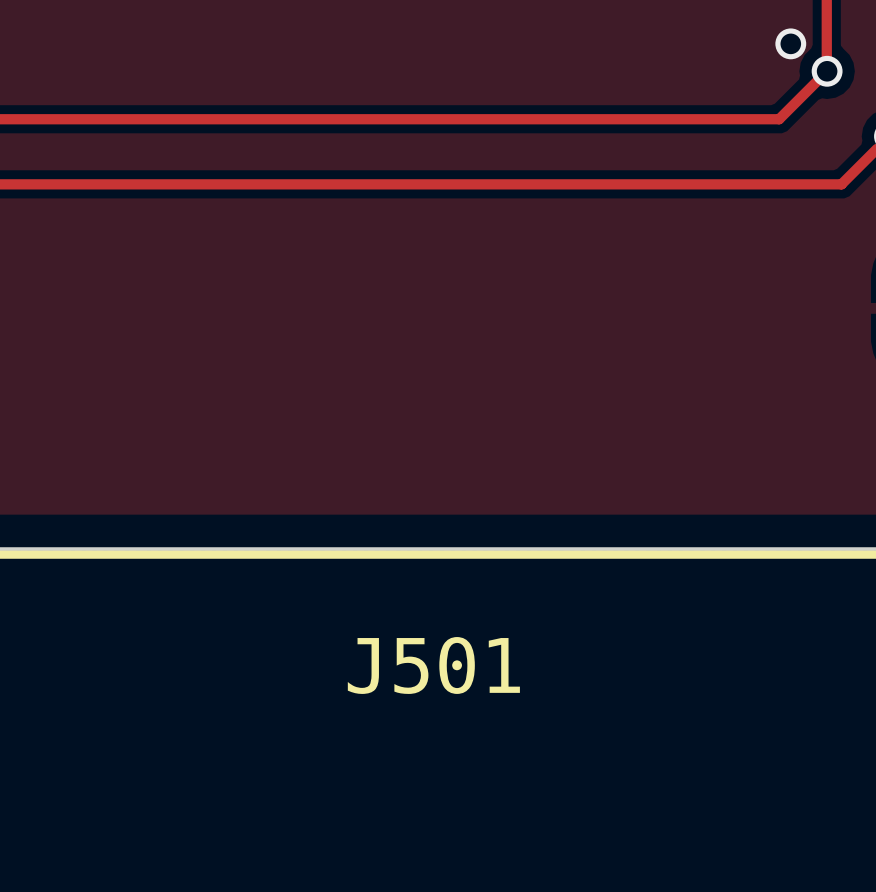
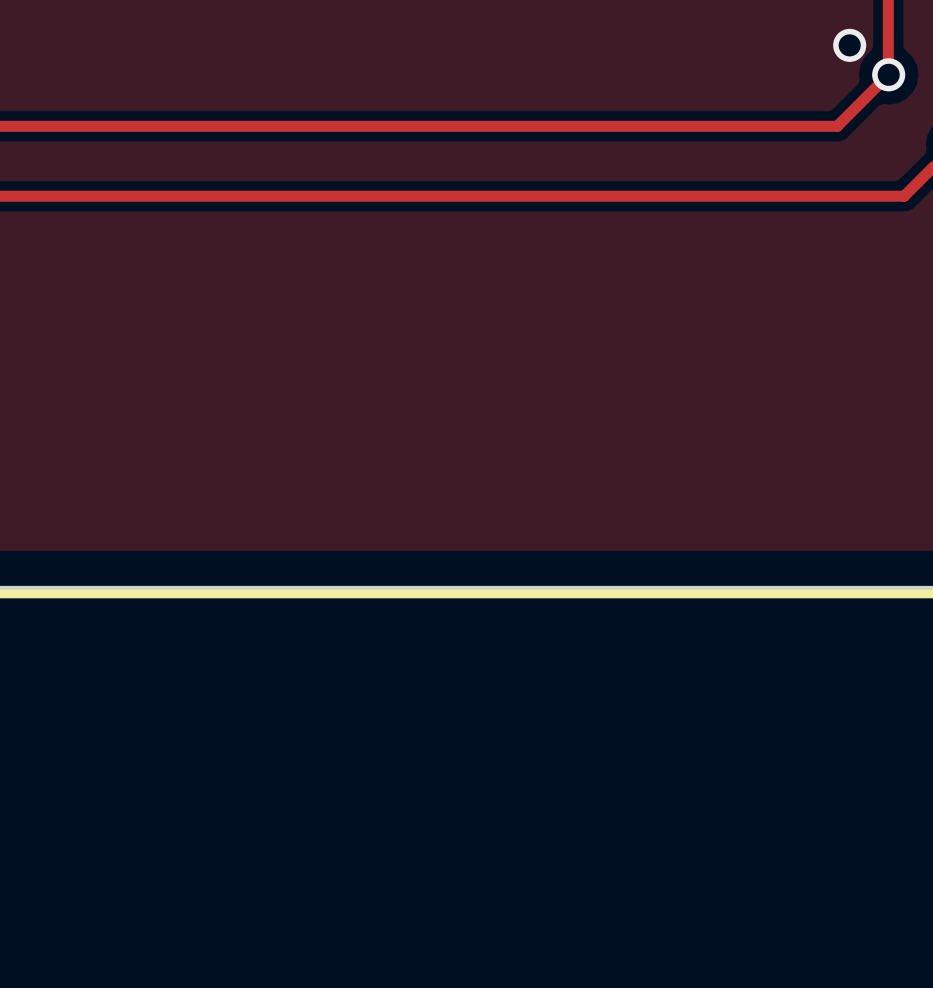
J501 name: J501 (433, 665) -> none

